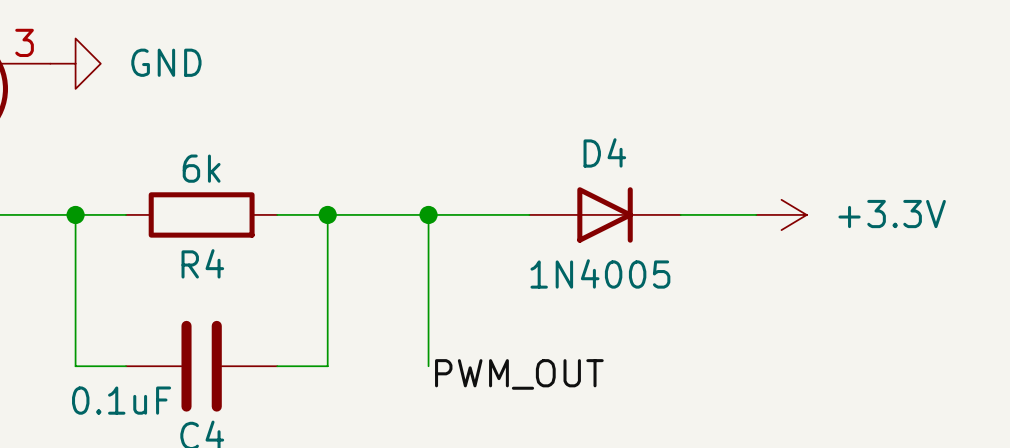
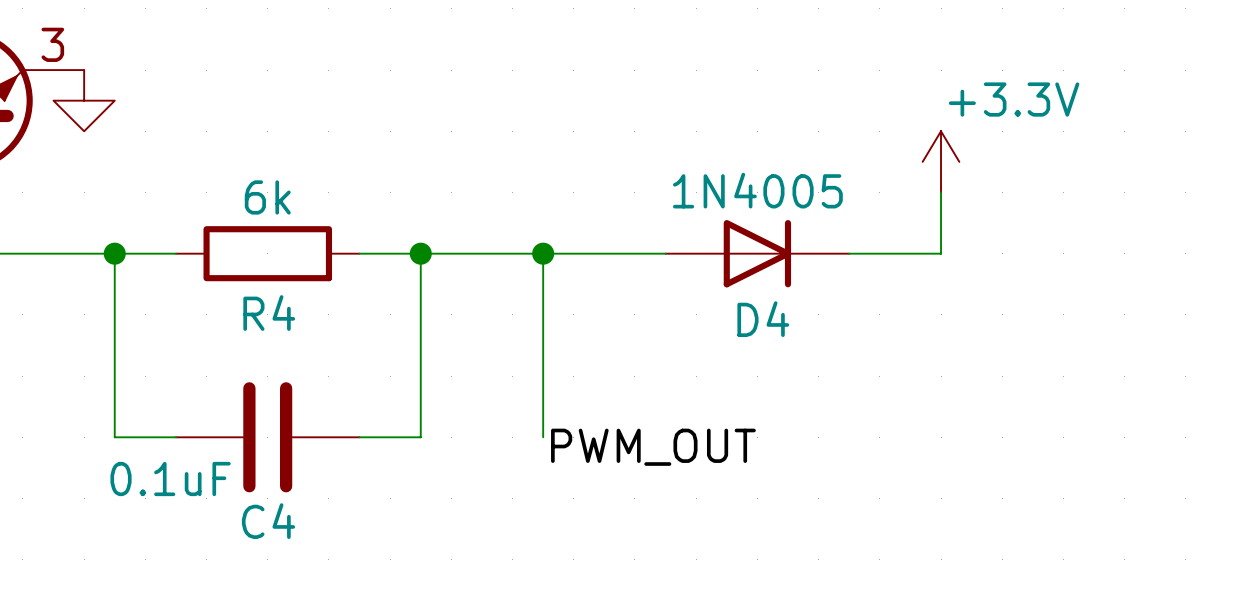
power symbol: GND (75, 63) -> none
power symbol: none -> (84, 100)
D4 name position: D4 (604, 152) -> D4 (763, 319)
wire: none -> (941, 192) (941, 253)
power symbol rotation: 0° (781, 214) -> 90° counterclockwise (941, 161)
power symbol position: +3.3V (781, 214) -> +3.3V (941, 161)
power symbol text position: +3.3V (892, 214) -> +3.3V (1014, 99)
D4 value position: 1N4005 (600, 273) -> 1N4005 (757, 190)

